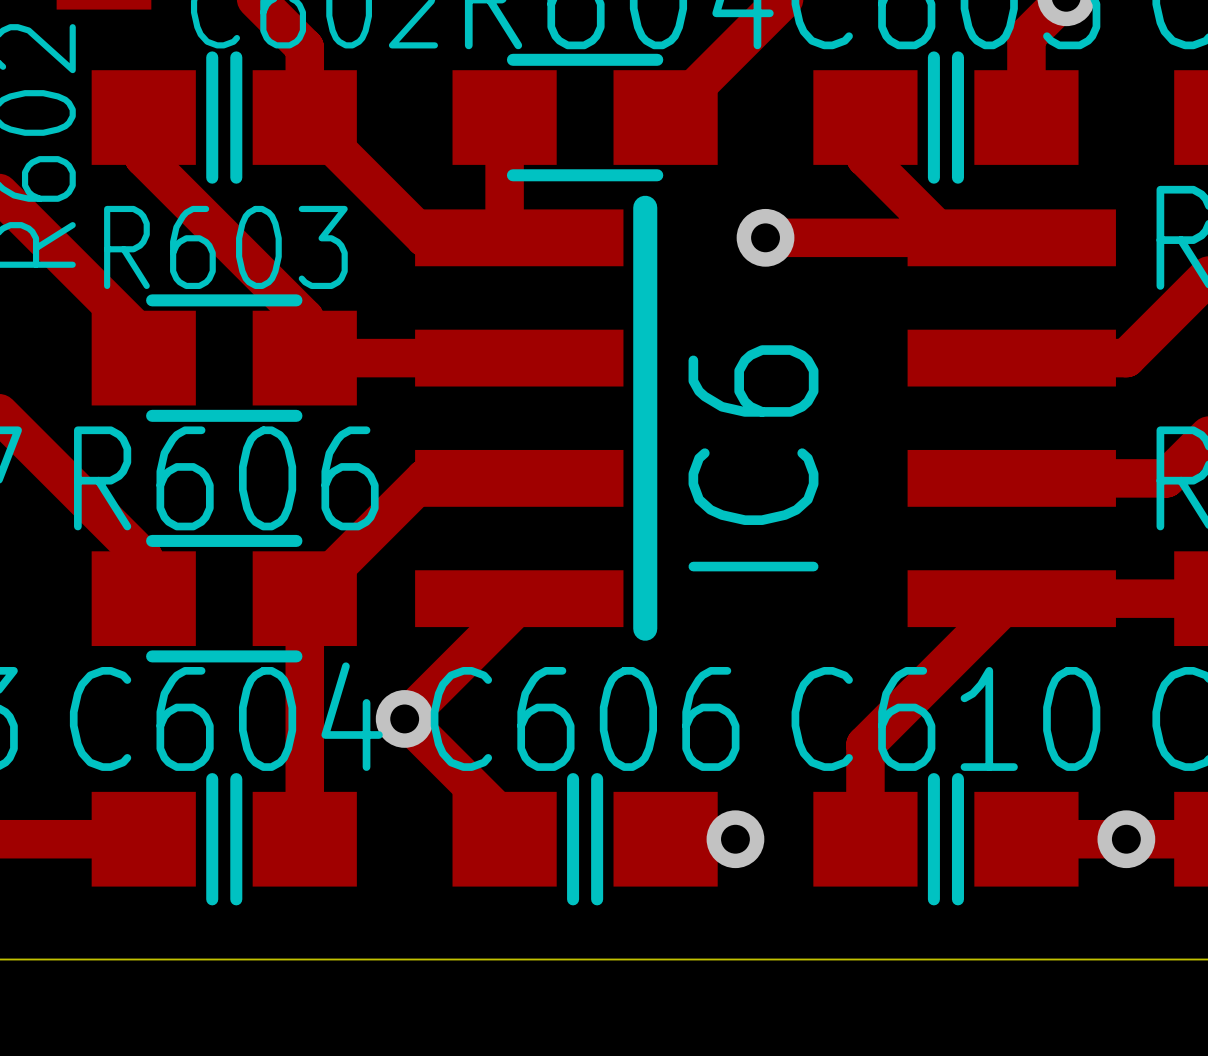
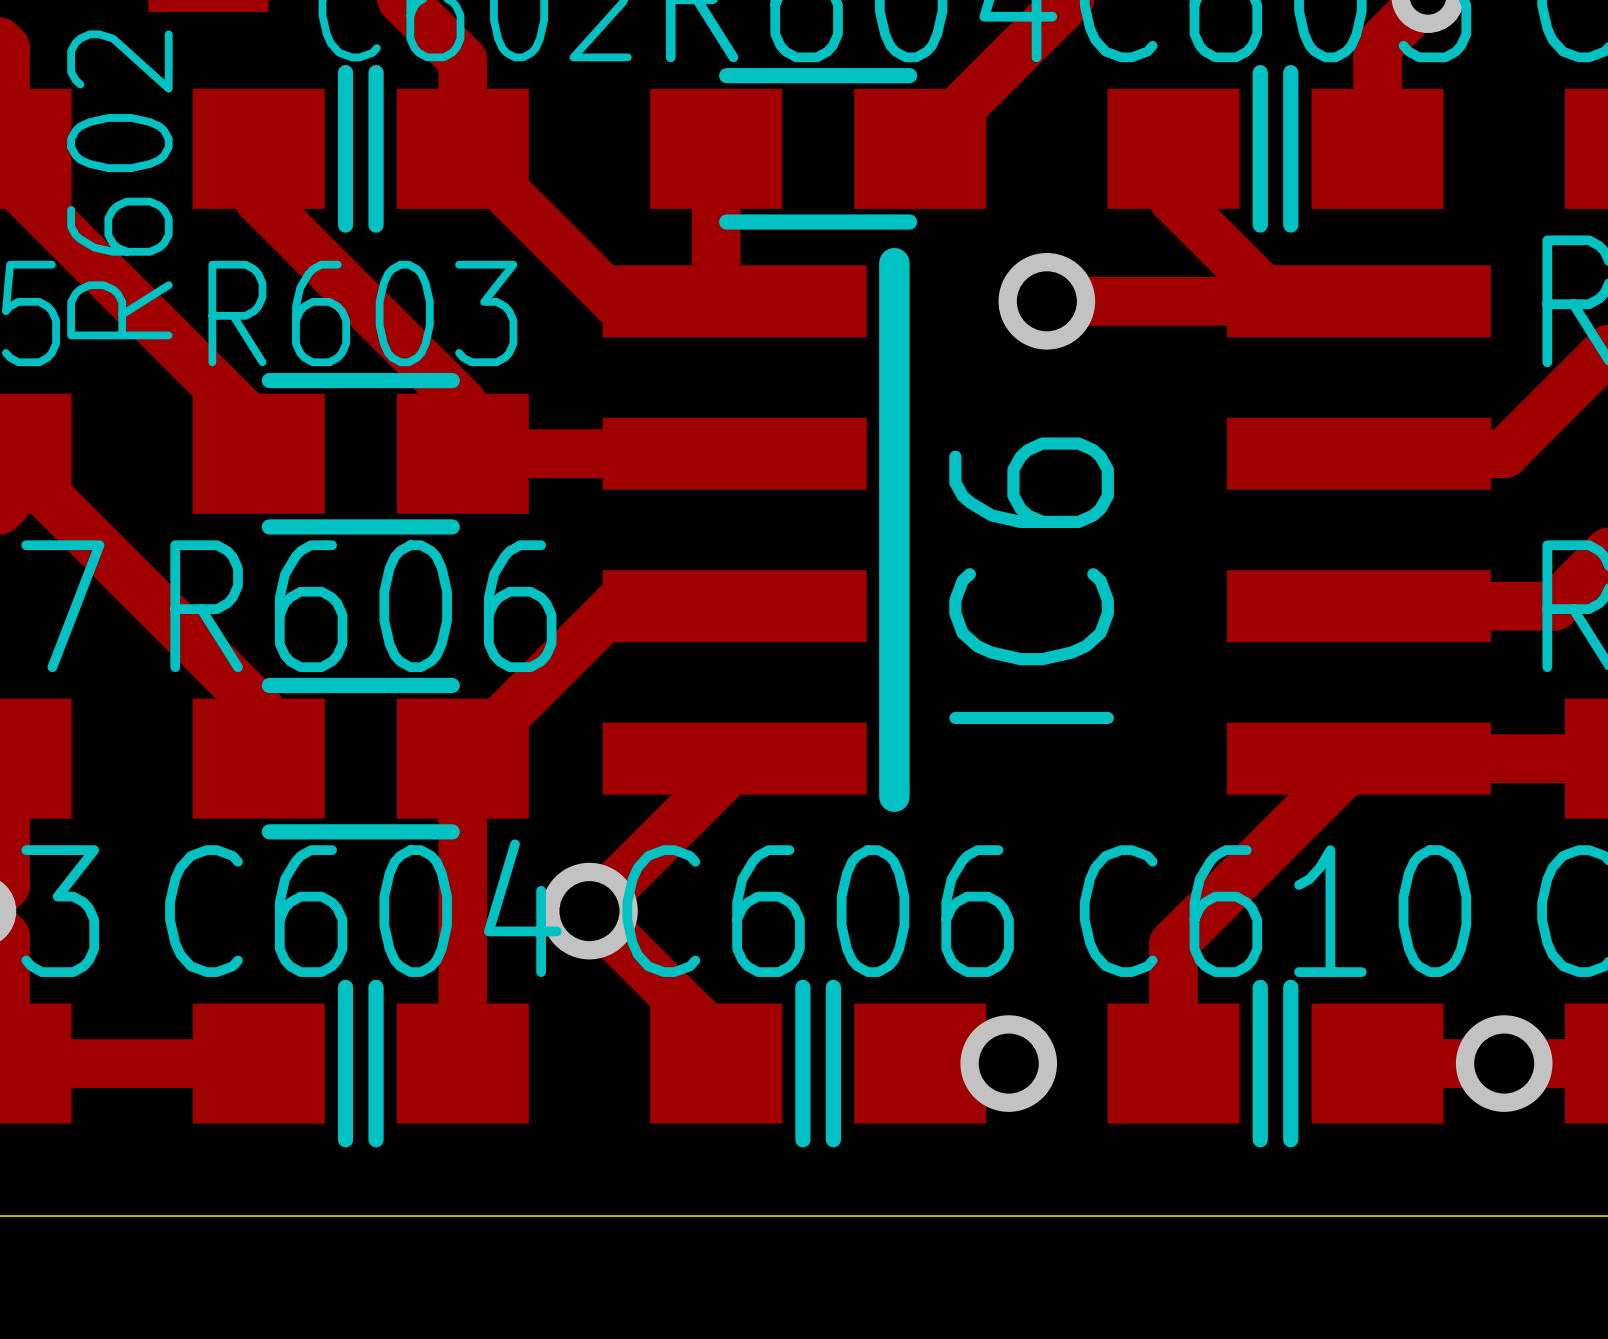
via size: [736, 208, 795, 267] -> [998, 252, 1096, 350]
via size: [375, 690, 434, 748] -> [541, 862, 638, 960]
via size: [706, 810, 765, 869] -> [960, 1015, 1058, 1112]
via size: [1097, 810, 1156, 869] -> [1455, 1015, 1553, 1112]

